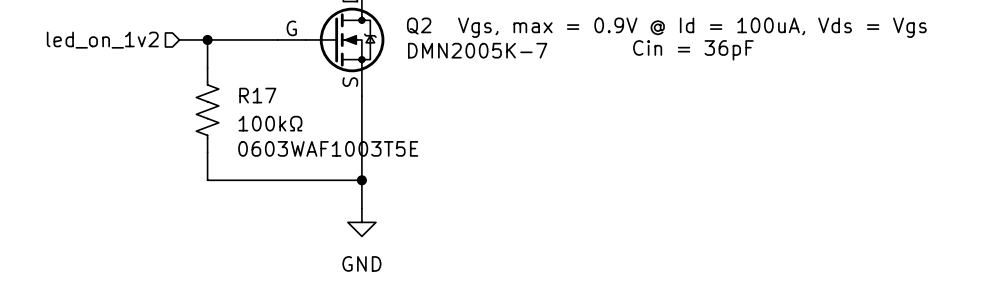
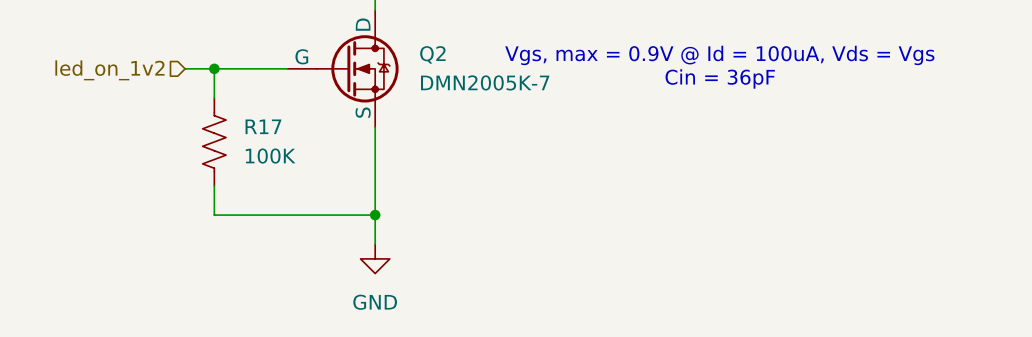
Q2 text: DMN2005K-7 (477, 50) -> none
Q2 value: none -> DMN2005K-7 (485, 82)
R17 value: 100kΩ (270, 123) -> 100K (270, 156)
R17 text: 0603WAF1003T5E (328, 148) -> none

